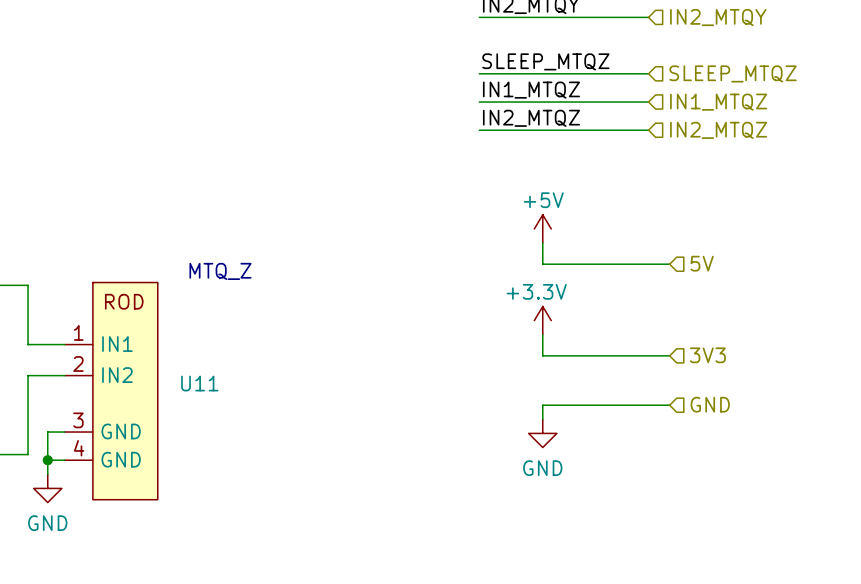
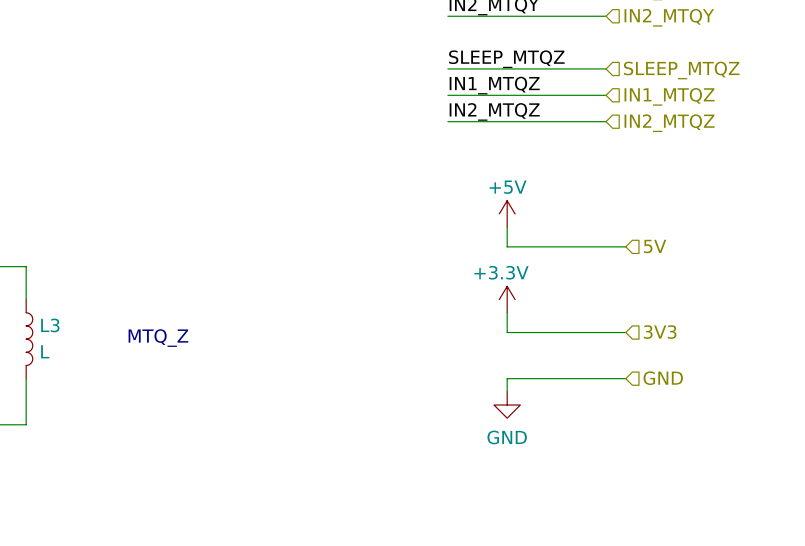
text position: MTQ_Z (220, 271) -> MTQ_Z (158, 338)
wire: (28, 320) (28, 344) (64, 344) -> none
L3: none -> L (29, 339)
wire: (64, 375) (28, 375) (28, 405) -> none
U11: (111, 391) -> none
wire: (64, 432) (47, 432) (47, 474) -> none
wire: (47, 460) (64, 460) -> none
junction: (47, 460) -> none
power symbol: GND (47, 488) -> none

